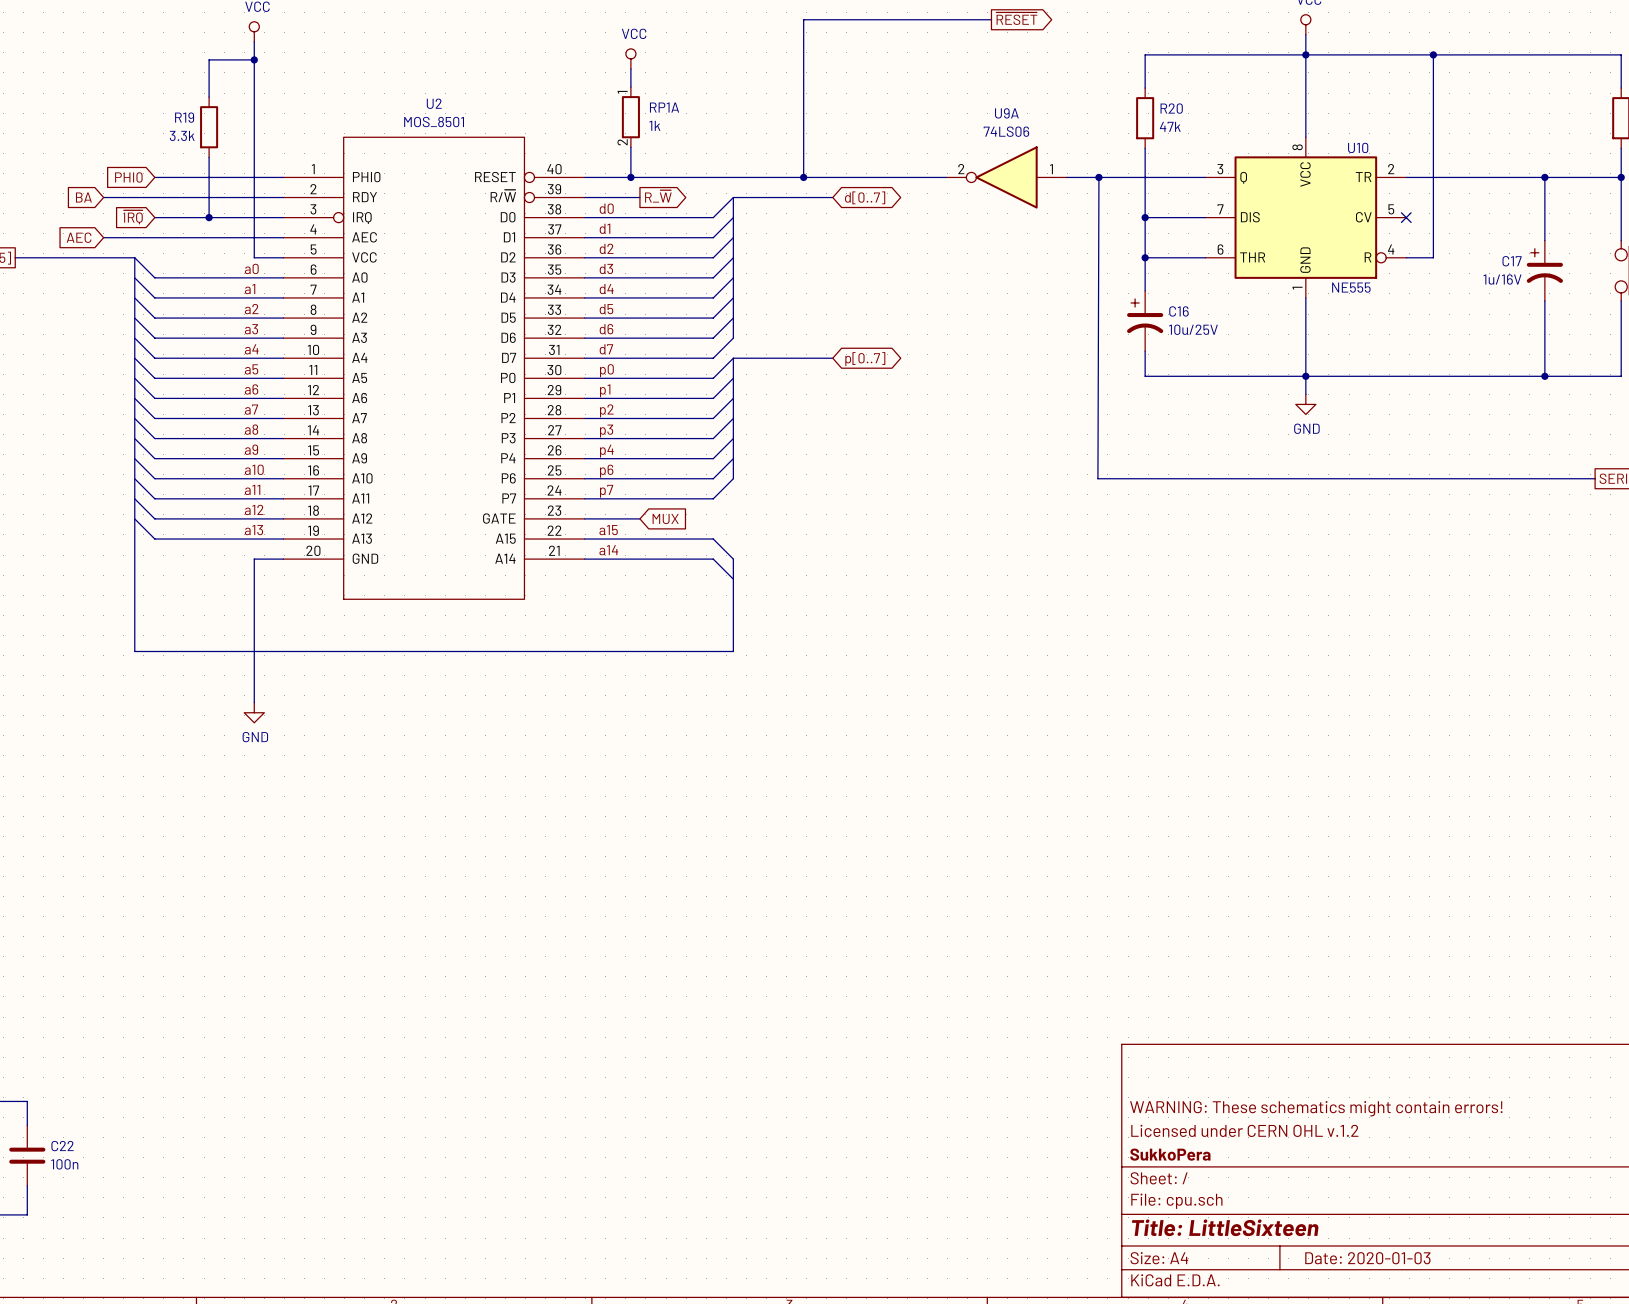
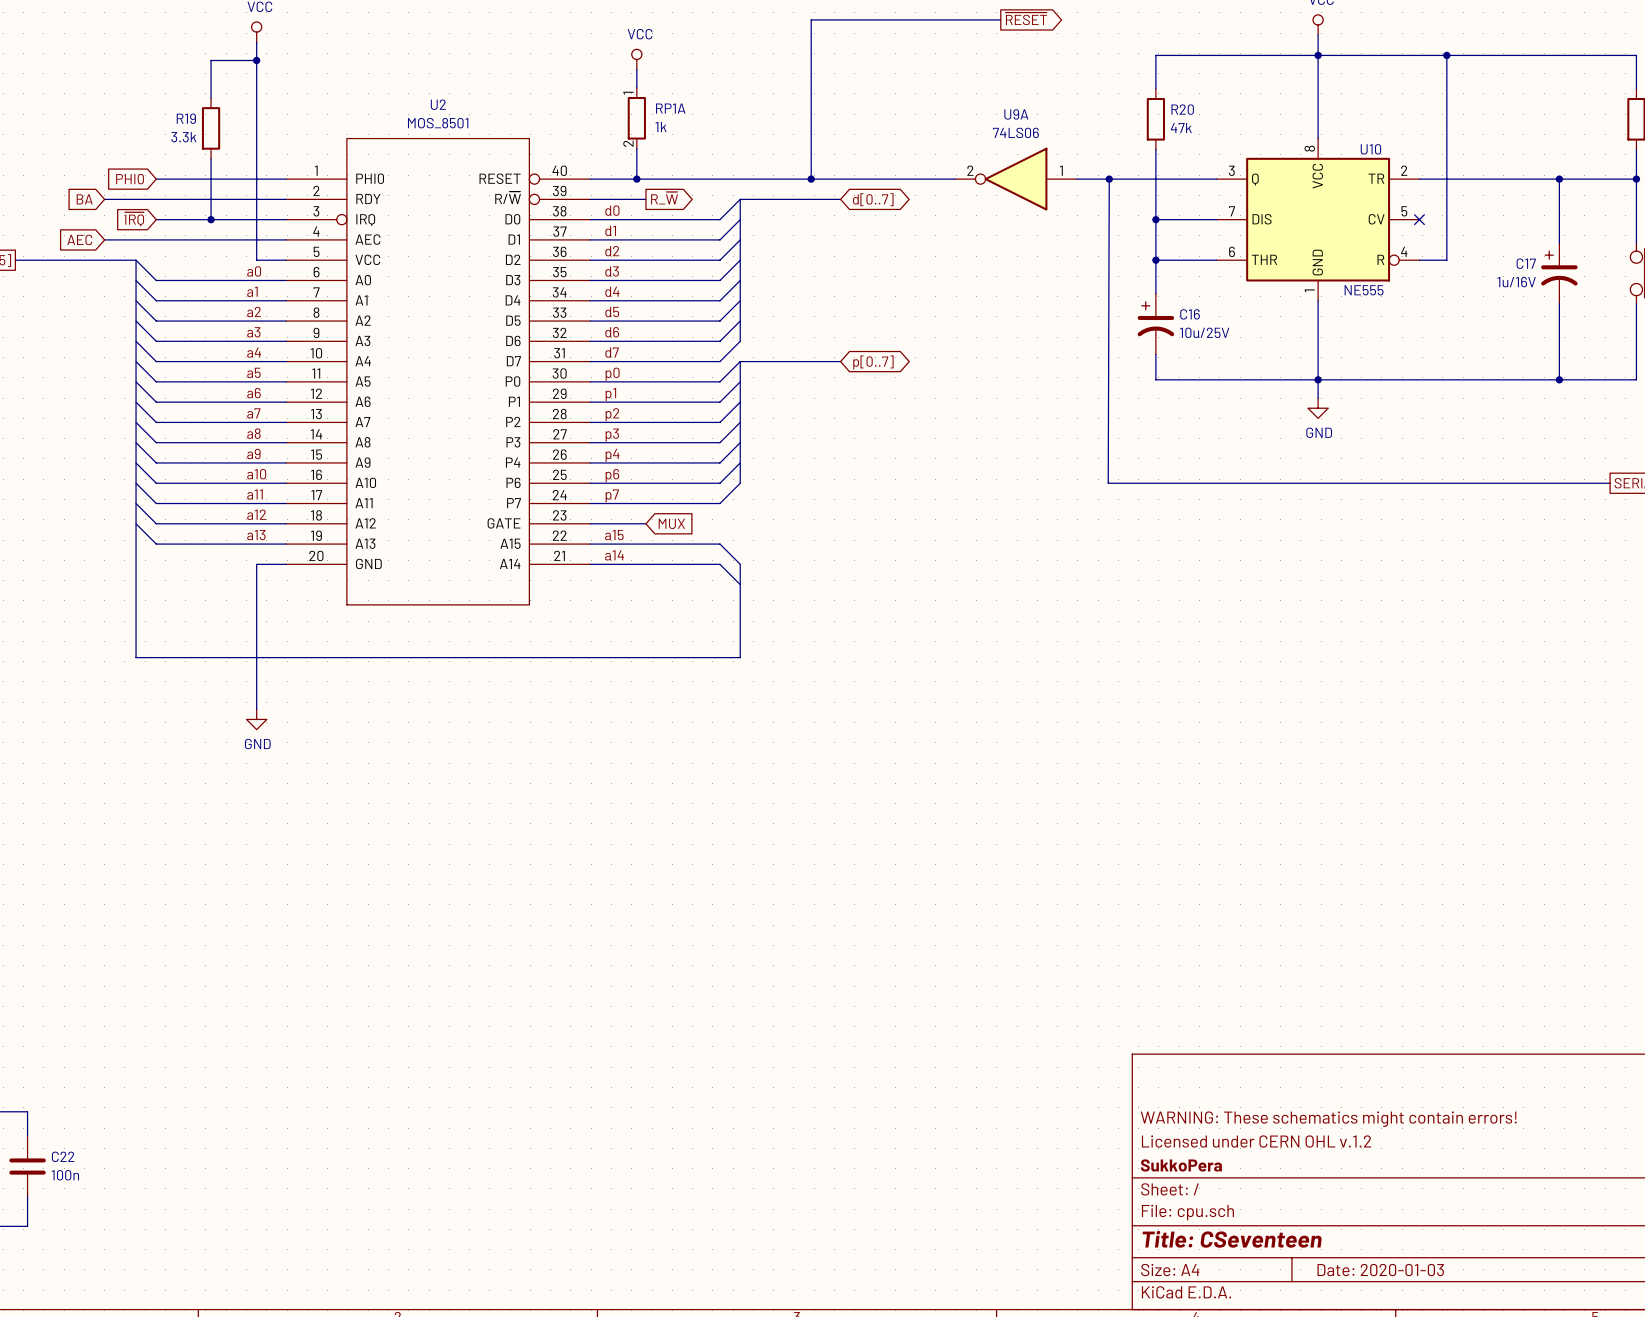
title block: Title: LittleSixteen (1225, 1227) -> Title: CSeventeen (1232, 1239)

